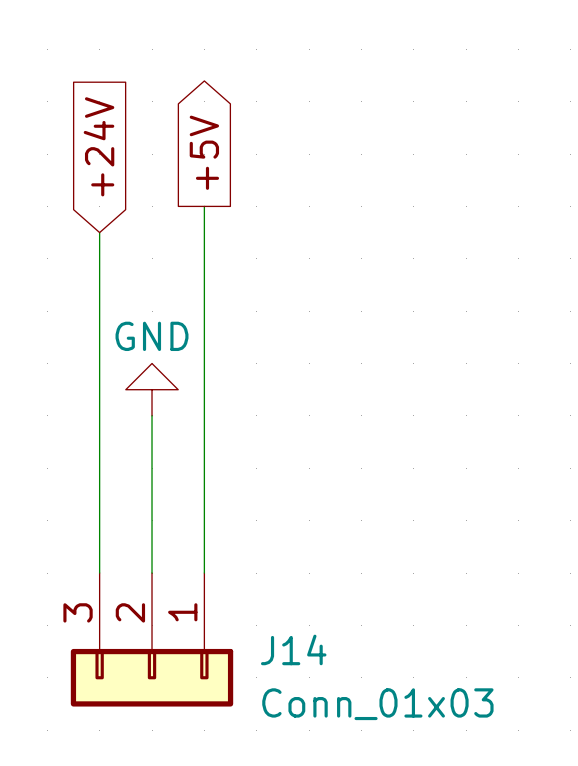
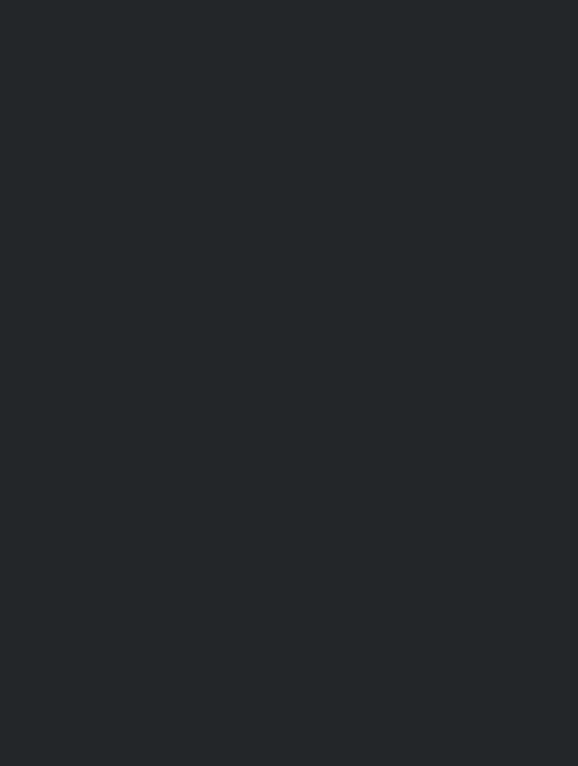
global label: +24V (99, 146) -> none
global label: +5V (204, 152) -> none
wire: (204, 206) (204, 573) -> none
wire: (99, 232) (99, 573) -> none
power symbol: GND (152, 389) -> none
wire: (152, 415) (152, 573) -> none
J14: Conn_01x03 (152, 639) -> none

